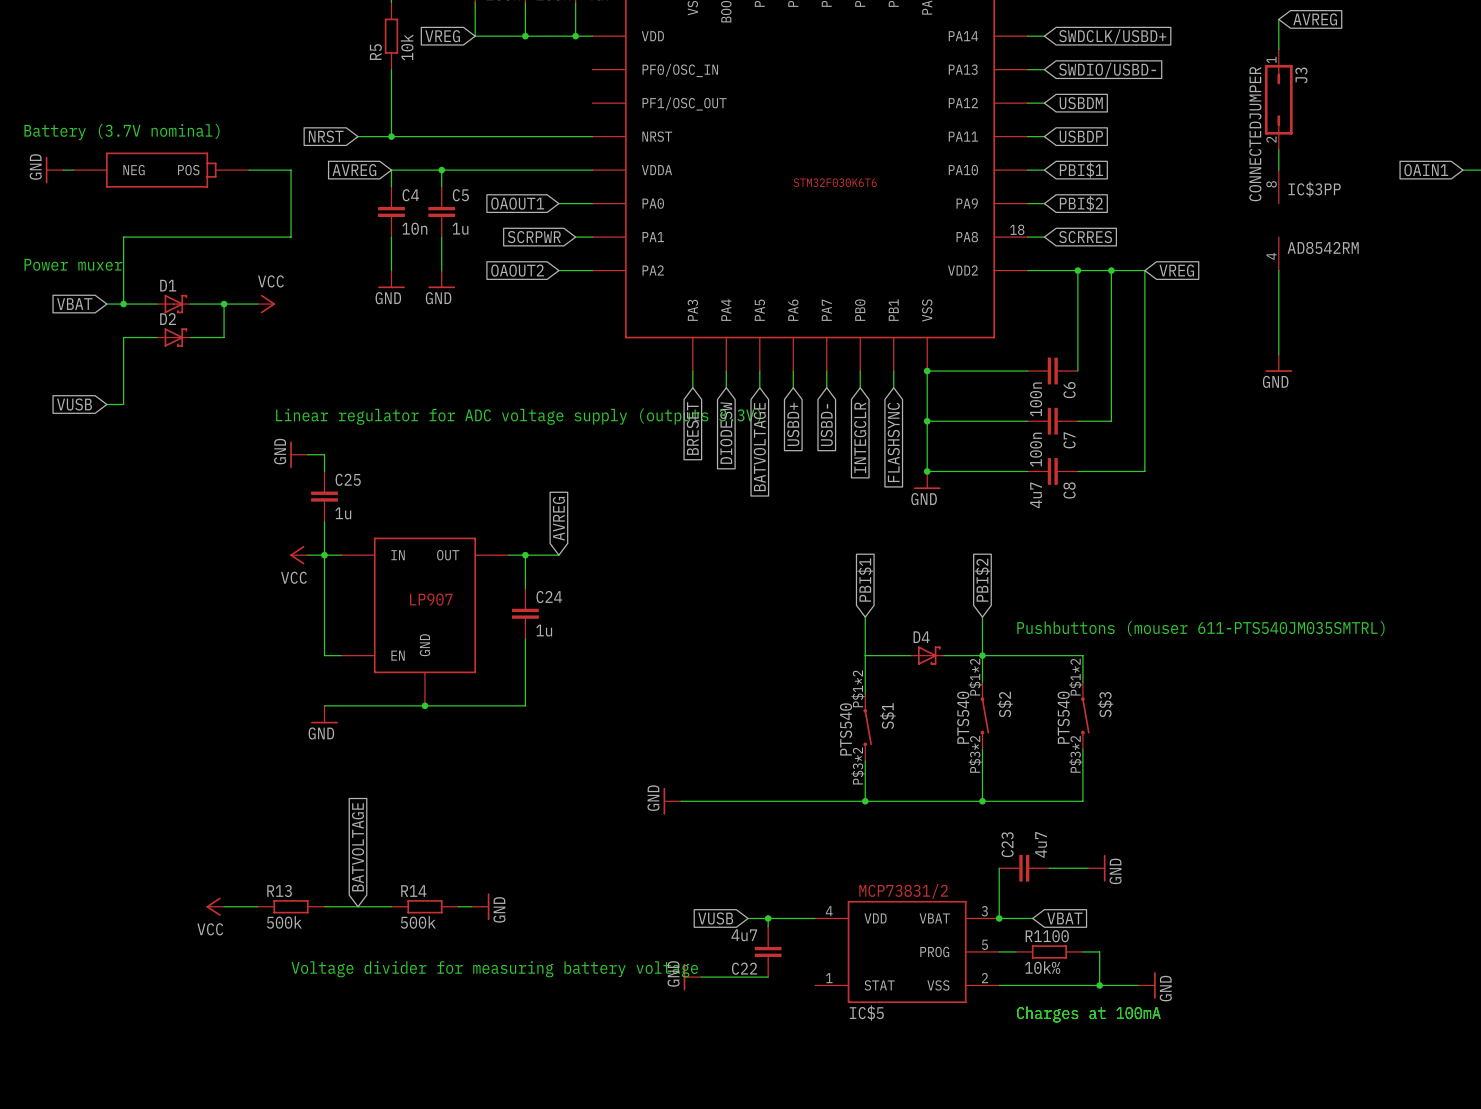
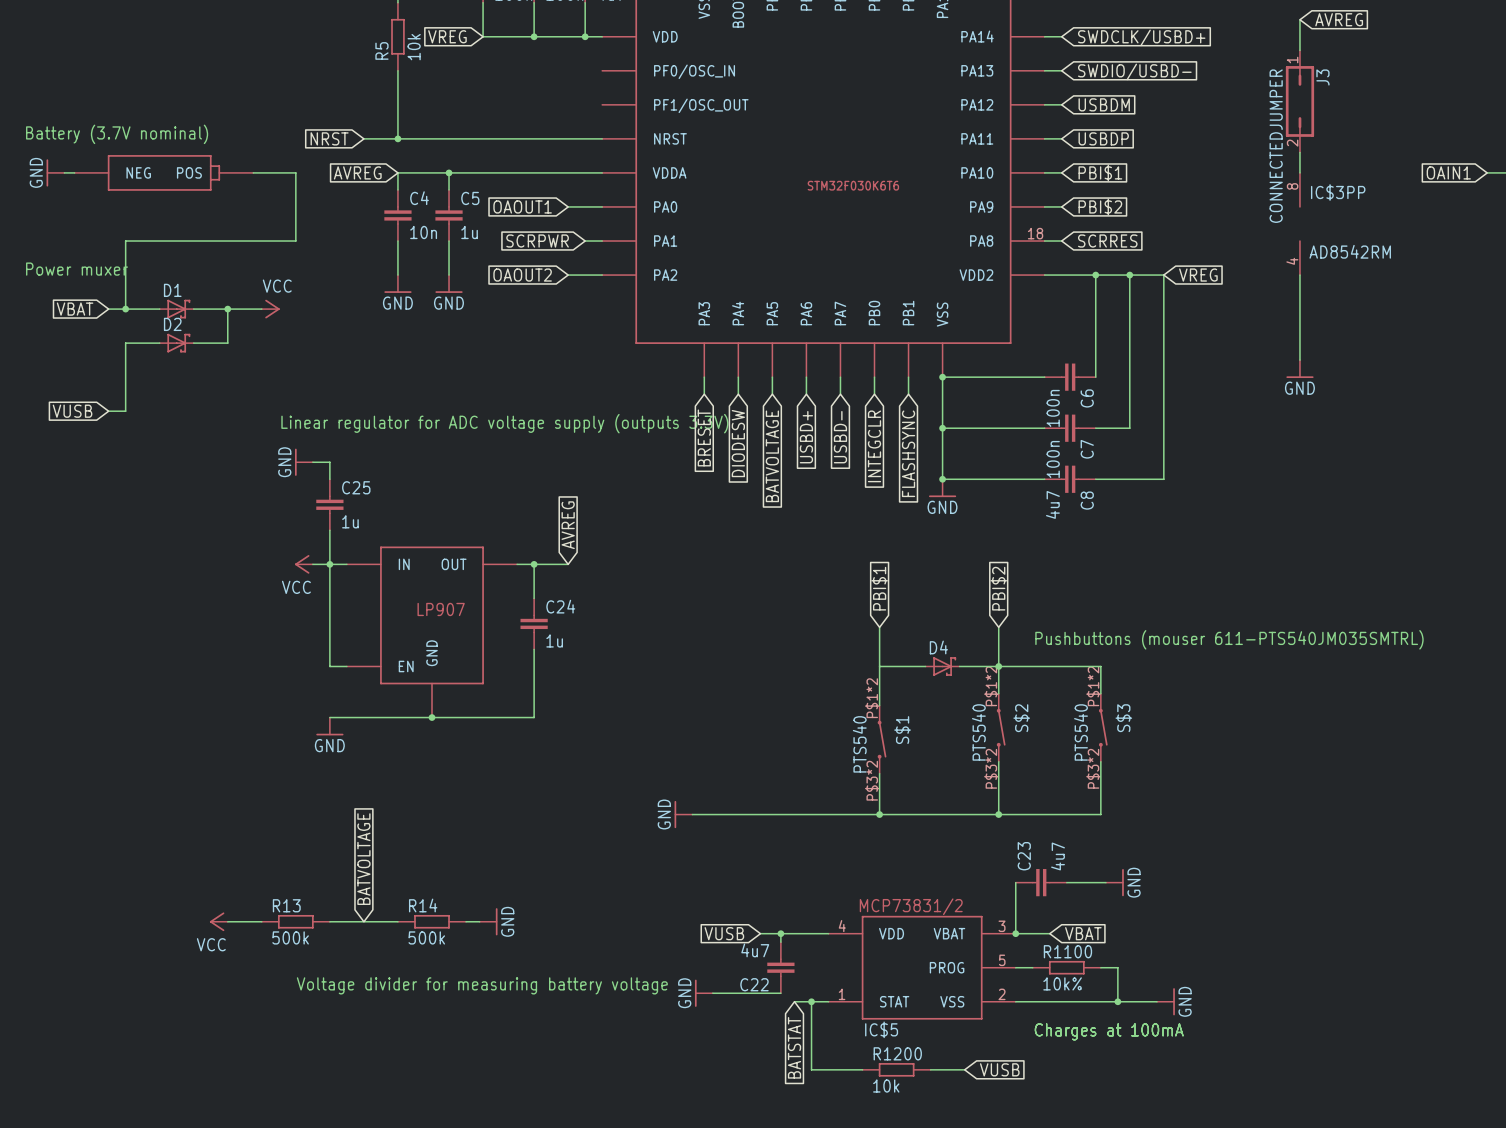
wire: none -> (794, 1001) (828, 1001)
wire: none -> (811, 1001) (811, 1069) (862, 1069)
junction: none -> (811, 1001)
global label: none -> BATSTAT (794, 1047)
R1200: none -> 10k (896, 1069)
wire: none -> (930, 1069) (964, 1069)
global label: none -> VUSB (999, 1069)

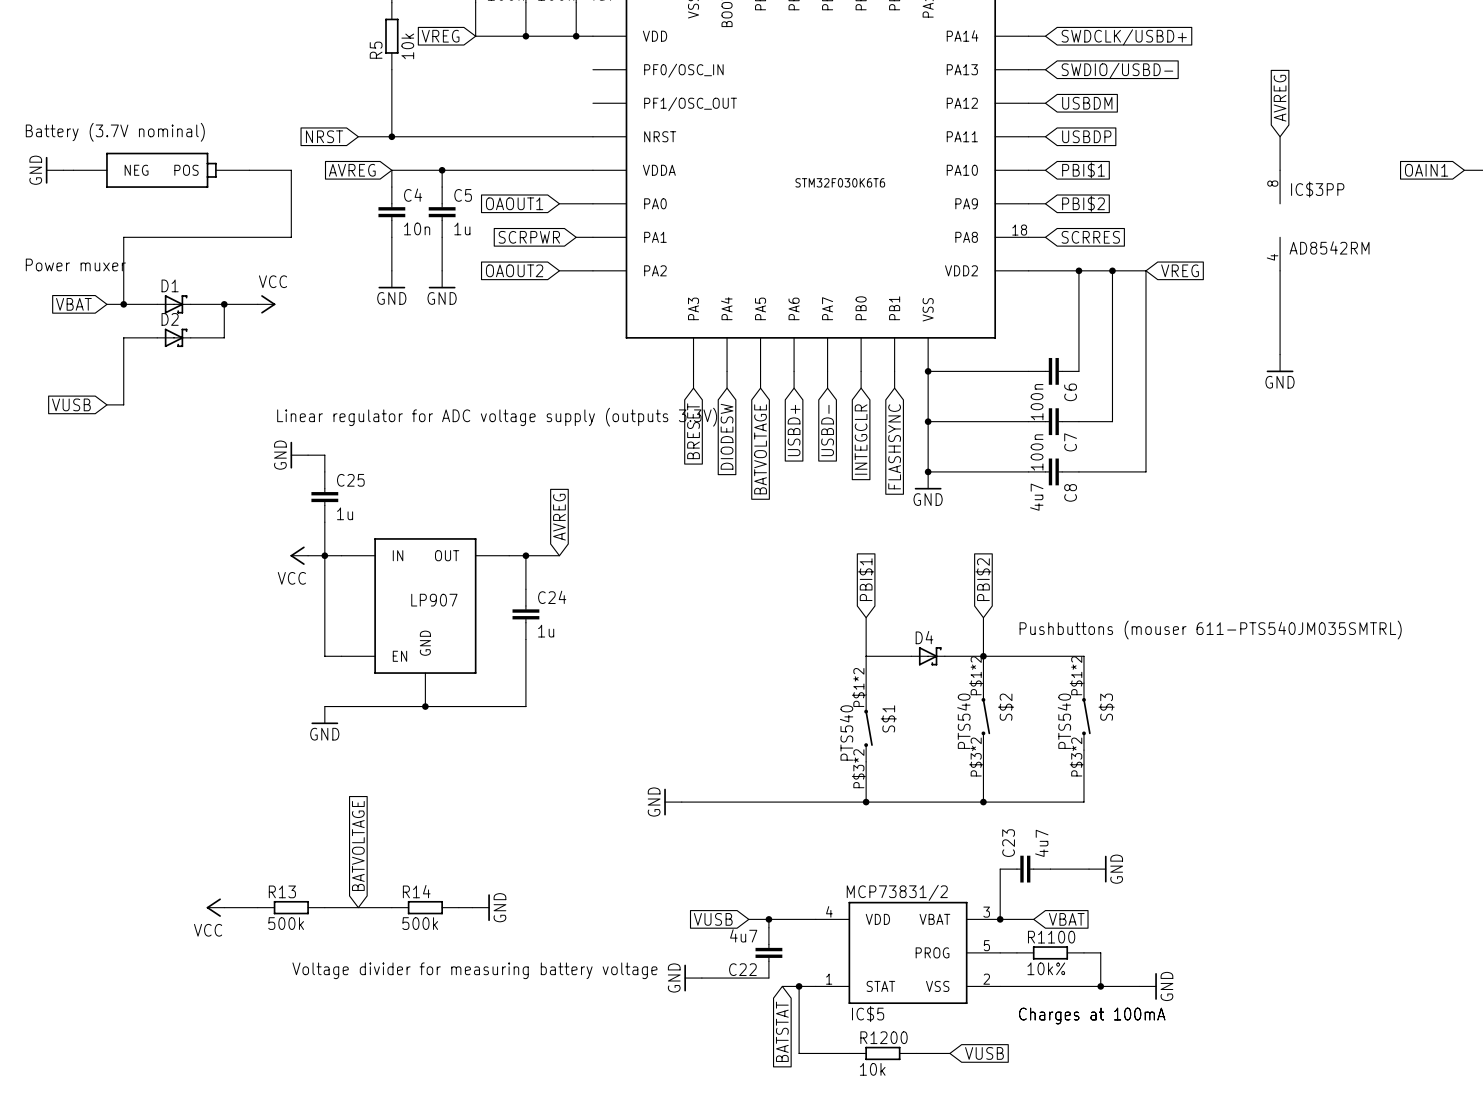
wire: (1299, 19) (1299, 50) -> none
global label rotation: 0° (1339, 19) -> 90° counterclockwise (1280, 98)
J3: CONNECTEDJUMPER (1299, 101) -> none

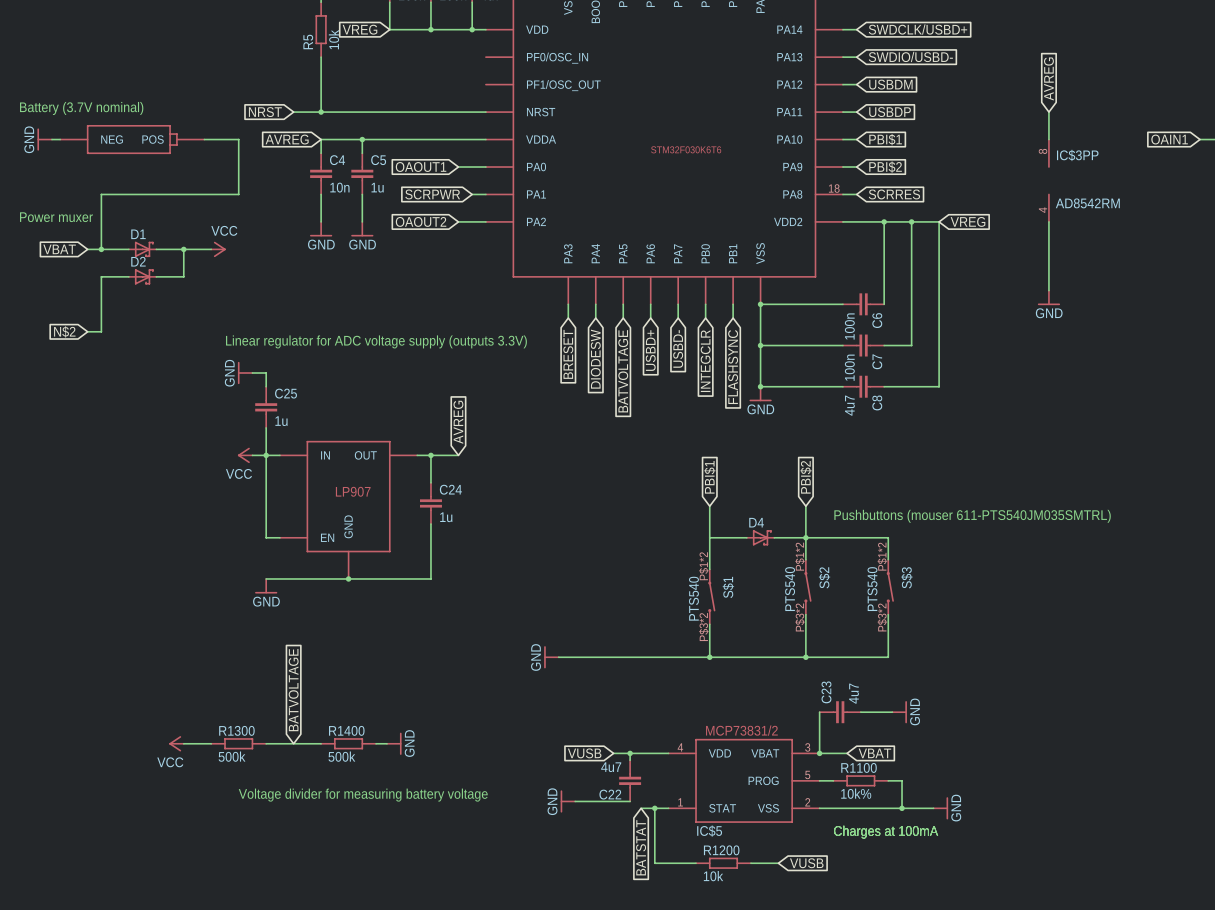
global label: VUSB (71, 404) -> N$2 (64, 331)
R13 name: R13 (282, 891) -> R1300 (236, 730)
R14 name: R14 (416, 891) -> R1400 (346, 730)

